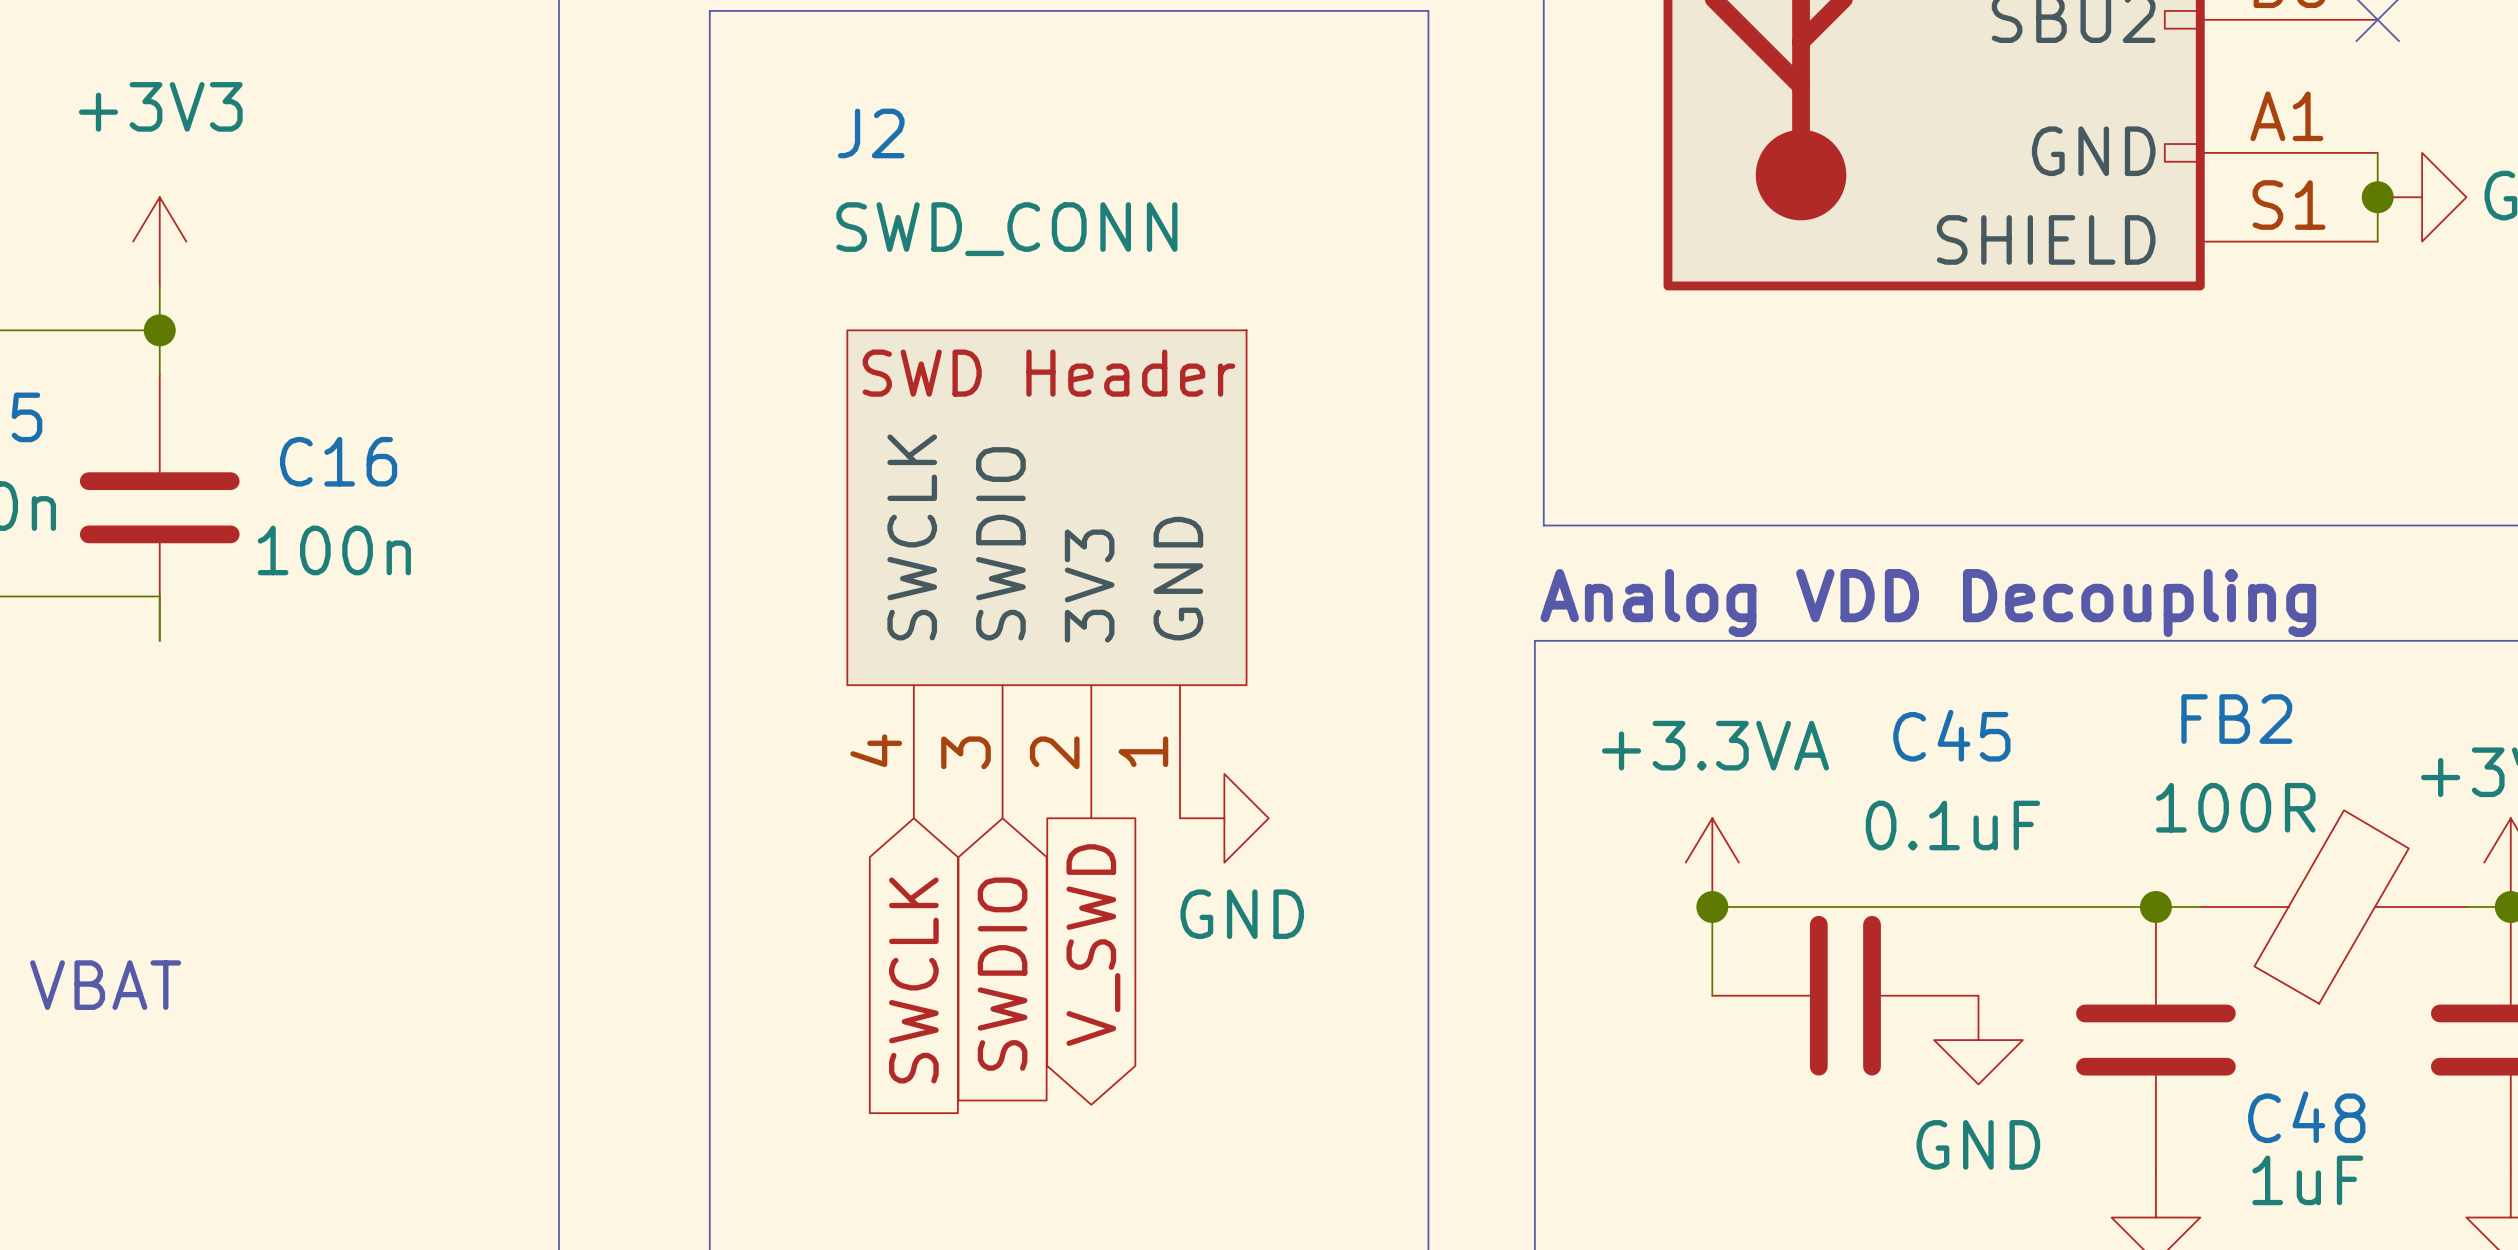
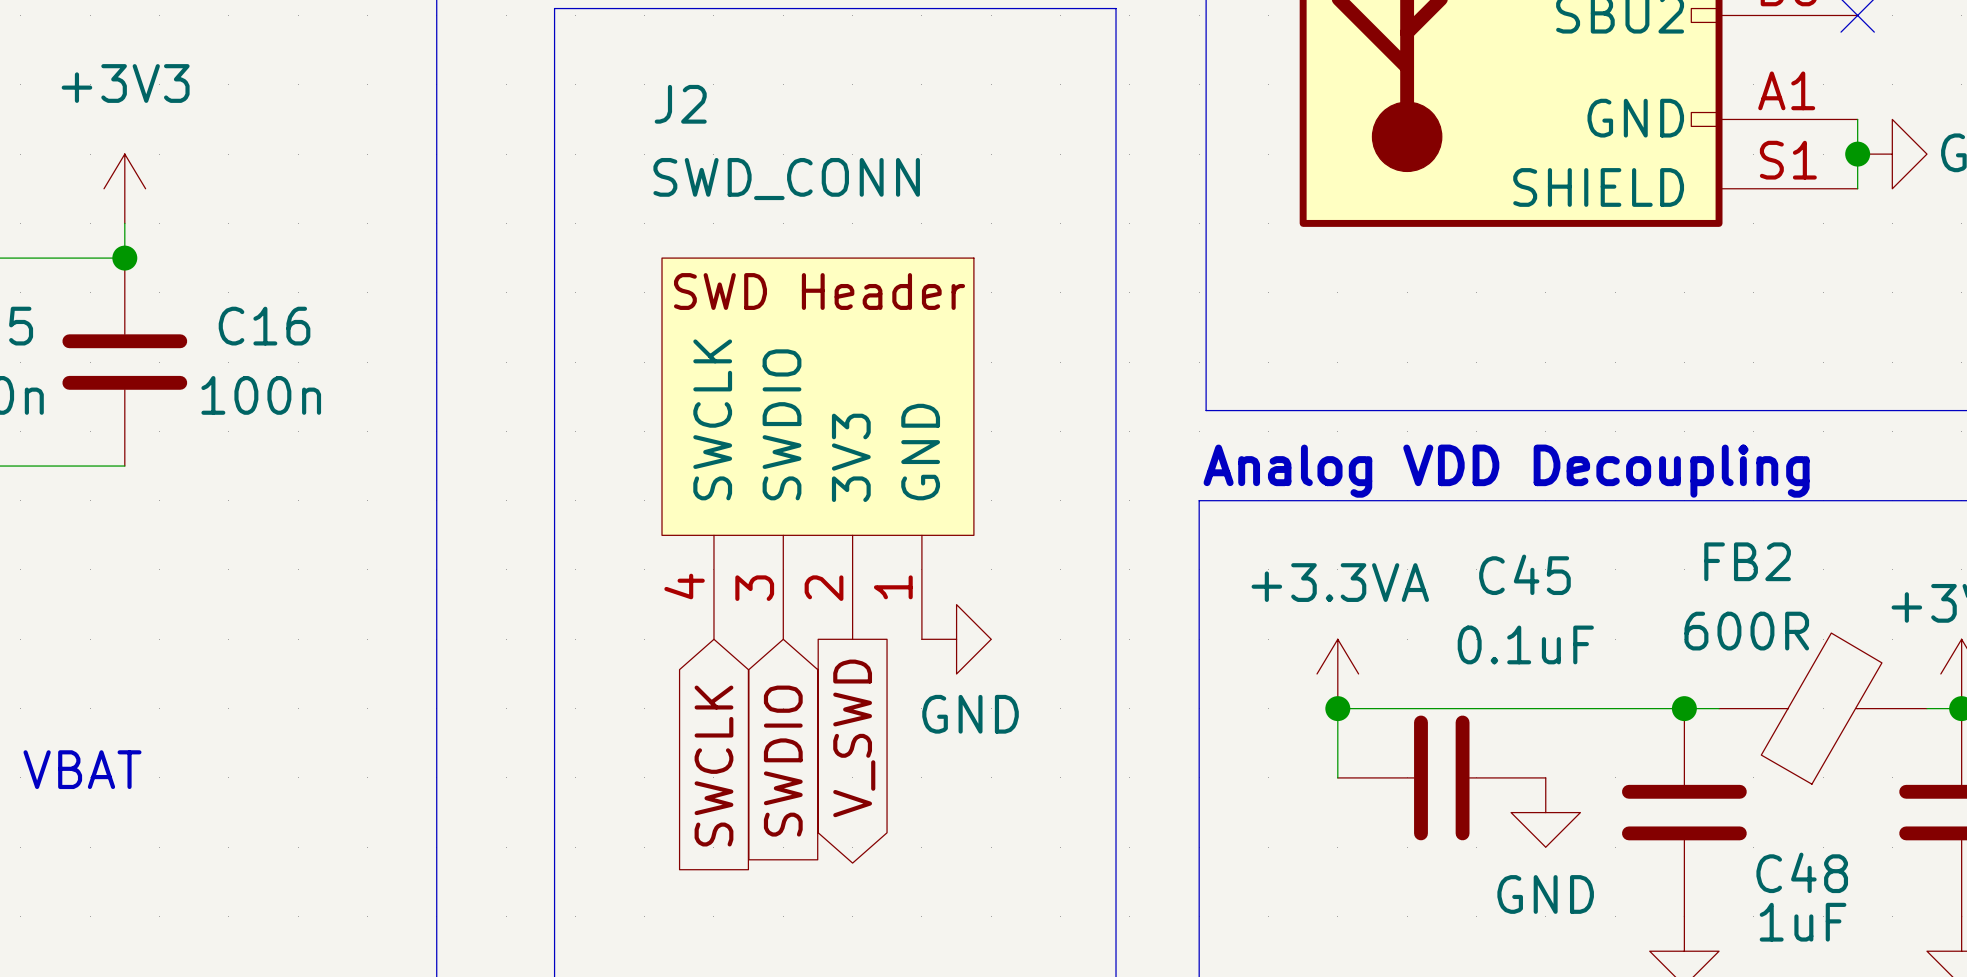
C16 position: (159, 507) -> (124, 362)
wire: (159, 596) (159, 640) -> none
FB2 value: 100R (2235, 807) -> 600R (1746, 631)

